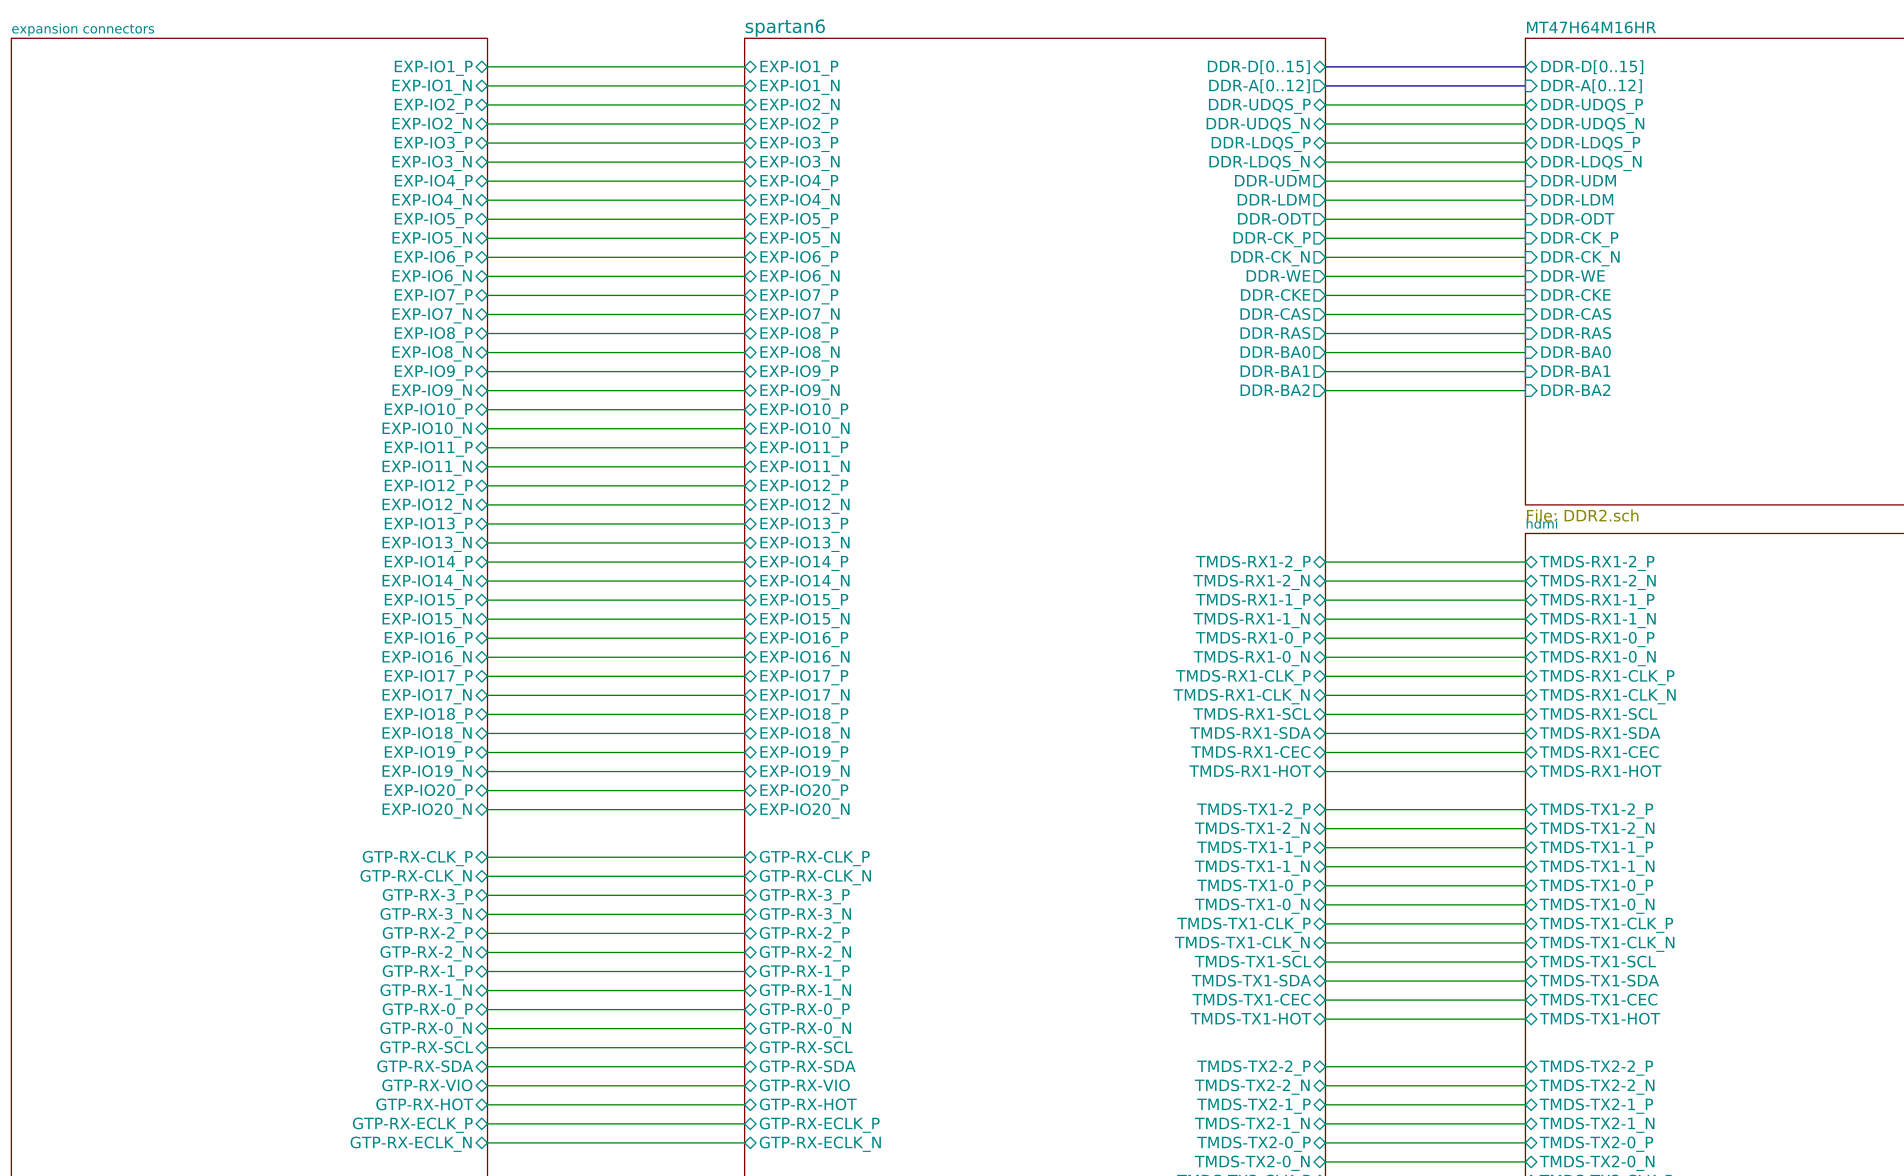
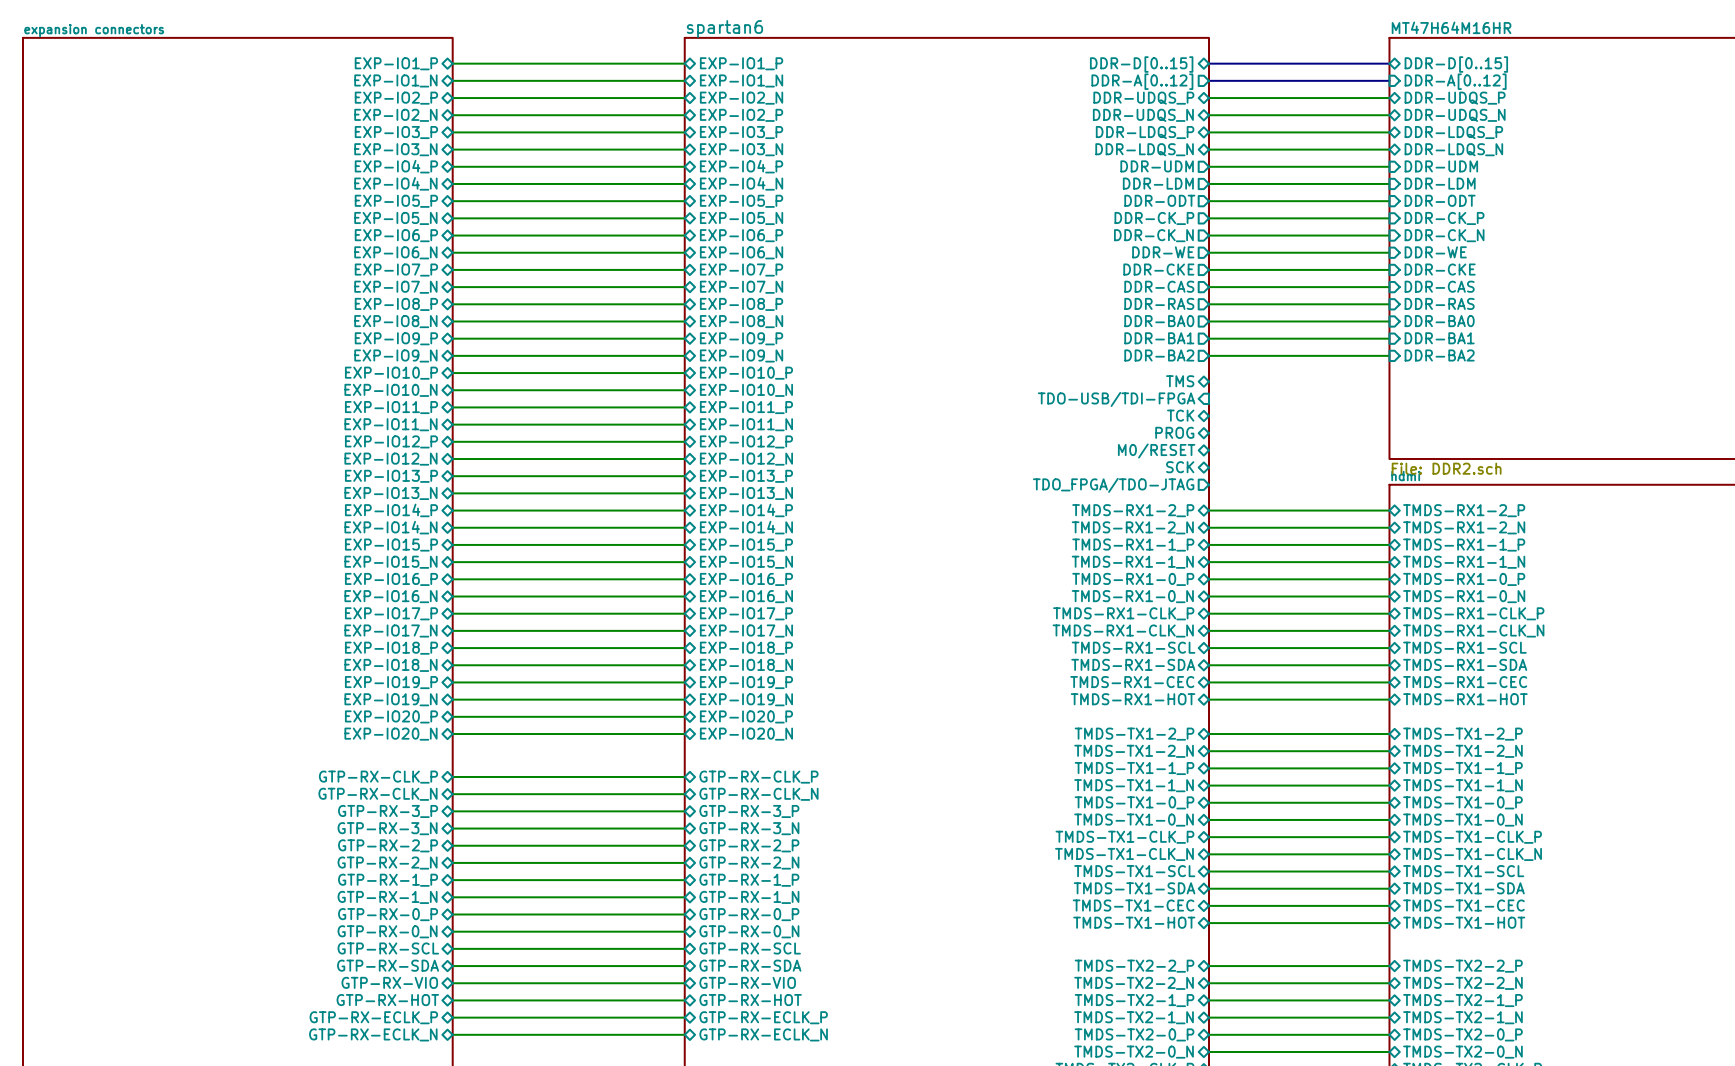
sheet pin: none -> TMS (1180, 381)
sheet pin: none -> TDO-USB/TDI-FPGA (1116, 399)
sheet pin: none -> TCK (1180, 415)
sheet pin: none -> PROG (1174, 432)
sheet pin: none -> M0/RESET (1156, 451)
sheet pin: none -> SCK (1180, 467)
sheet pin: none -> TDO_FPGA/TDO-JTAG (1113, 485)

